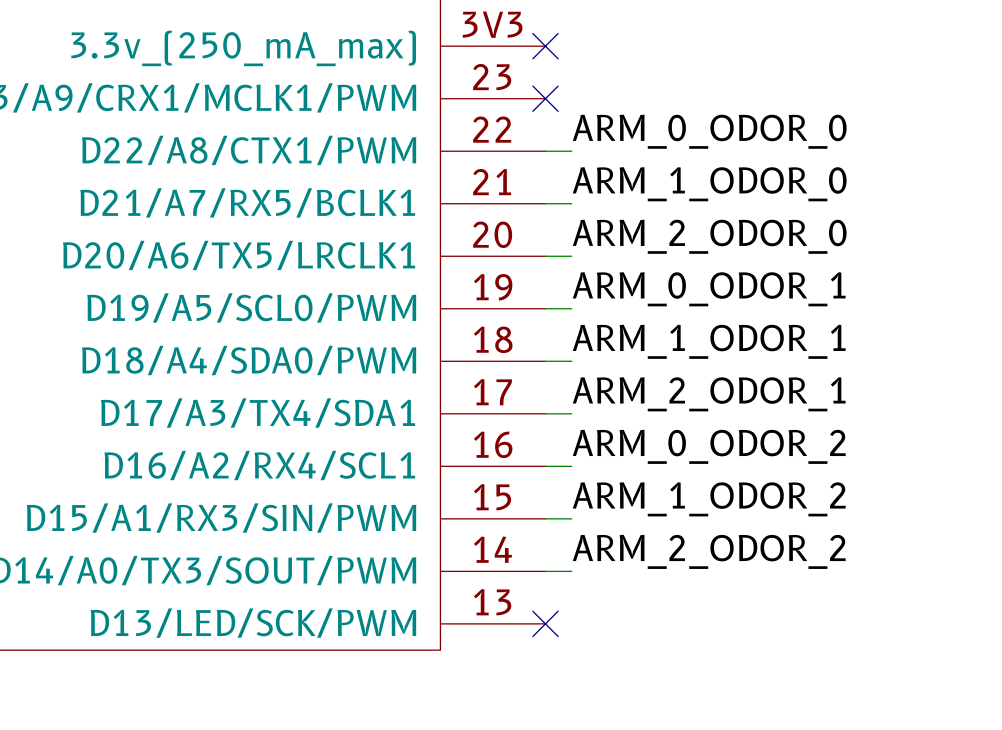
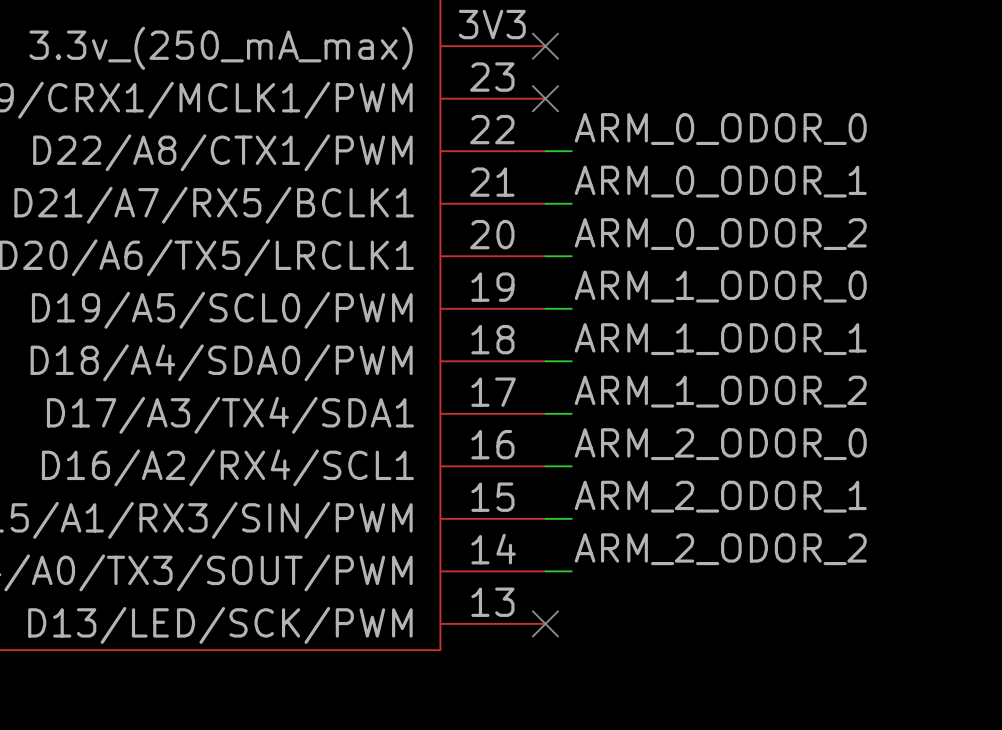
label: ARM_1_ODOR_0 (709, 184) -> ARM_0_ODOR_1 (720, 181)
label: ARM_2_ODOR_0 (709, 236) -> ARM_0_ODOR_2 (720, 234)
label: ARM_0_ODOR_1 (709, 289) -> ARM_1_ODOR_0 (720, 286)
label: ARM_2_ODOR_1 (709, 394) -> ARM_1_ODOR_2 (720, 391)
label: ARM_0_ODOR_2 (709, 446) -> ARM_2_ODOR_0 (720, 444)
label: ARM_1_ODOR_2 (709, 499) -> ARM_2_ODOR_1 (720, 496)

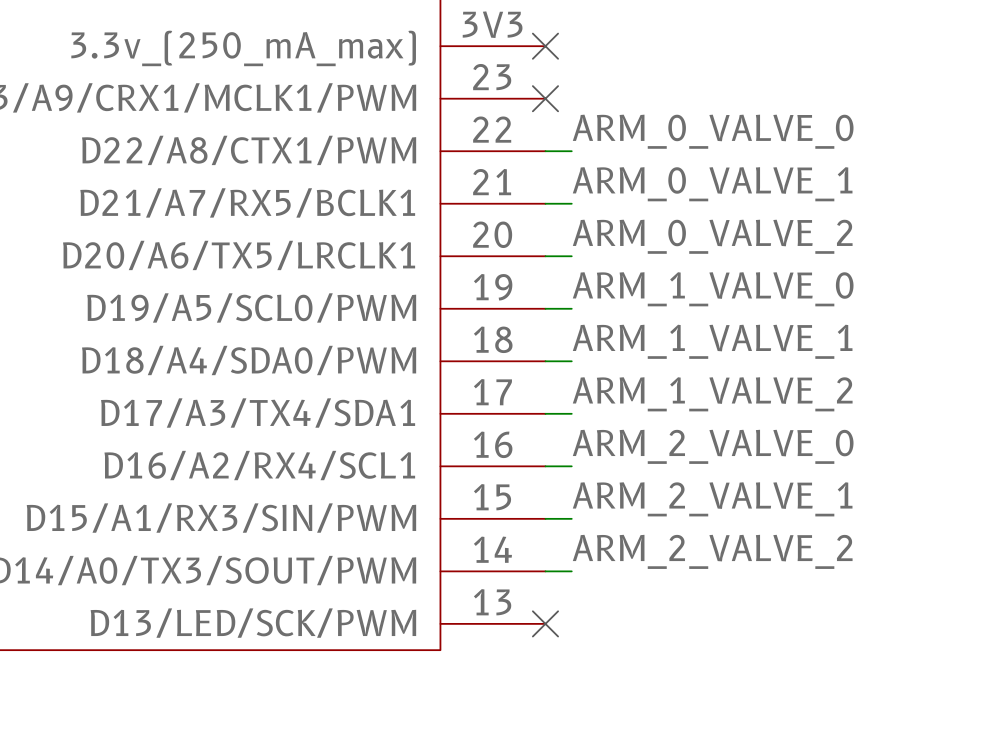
label: ARM_0_ODOR_0 (720, 129) -> ARM_0_VALVE_0 (713, 131)
label: ARM_0_ODOR_1 (720, 181) -> ARM_0_VALVE_1 (712, 184)
label: ARM_0_ODOR_2 (720, 234) -> ARM_0_VALVE_2 (712, 236)
label: ARM_1_ODOR_0 (720, 286) -> ARM_1_VALVE_0 (713, 289)
label: ARM_1_ODOR_1 (720, 339) -> ARM_1_VALVE_1 (712, 341)
label: ARM_1_ODOR_2 (720, 391) -> ARM_1_VALVE_2 (712, 394)
label: ARM_2_ODOR_0 (720, 444) -> ARM_2_VALVE_0 (713, 446)
label: ARM_2_ODOR_1 (720, 496) -> ARM_2_VALVE_1 (712, 499)
label: ARM_2_ODOR_2 (720, 549) -> ARM_2_VALVE_2 (712, 551)

